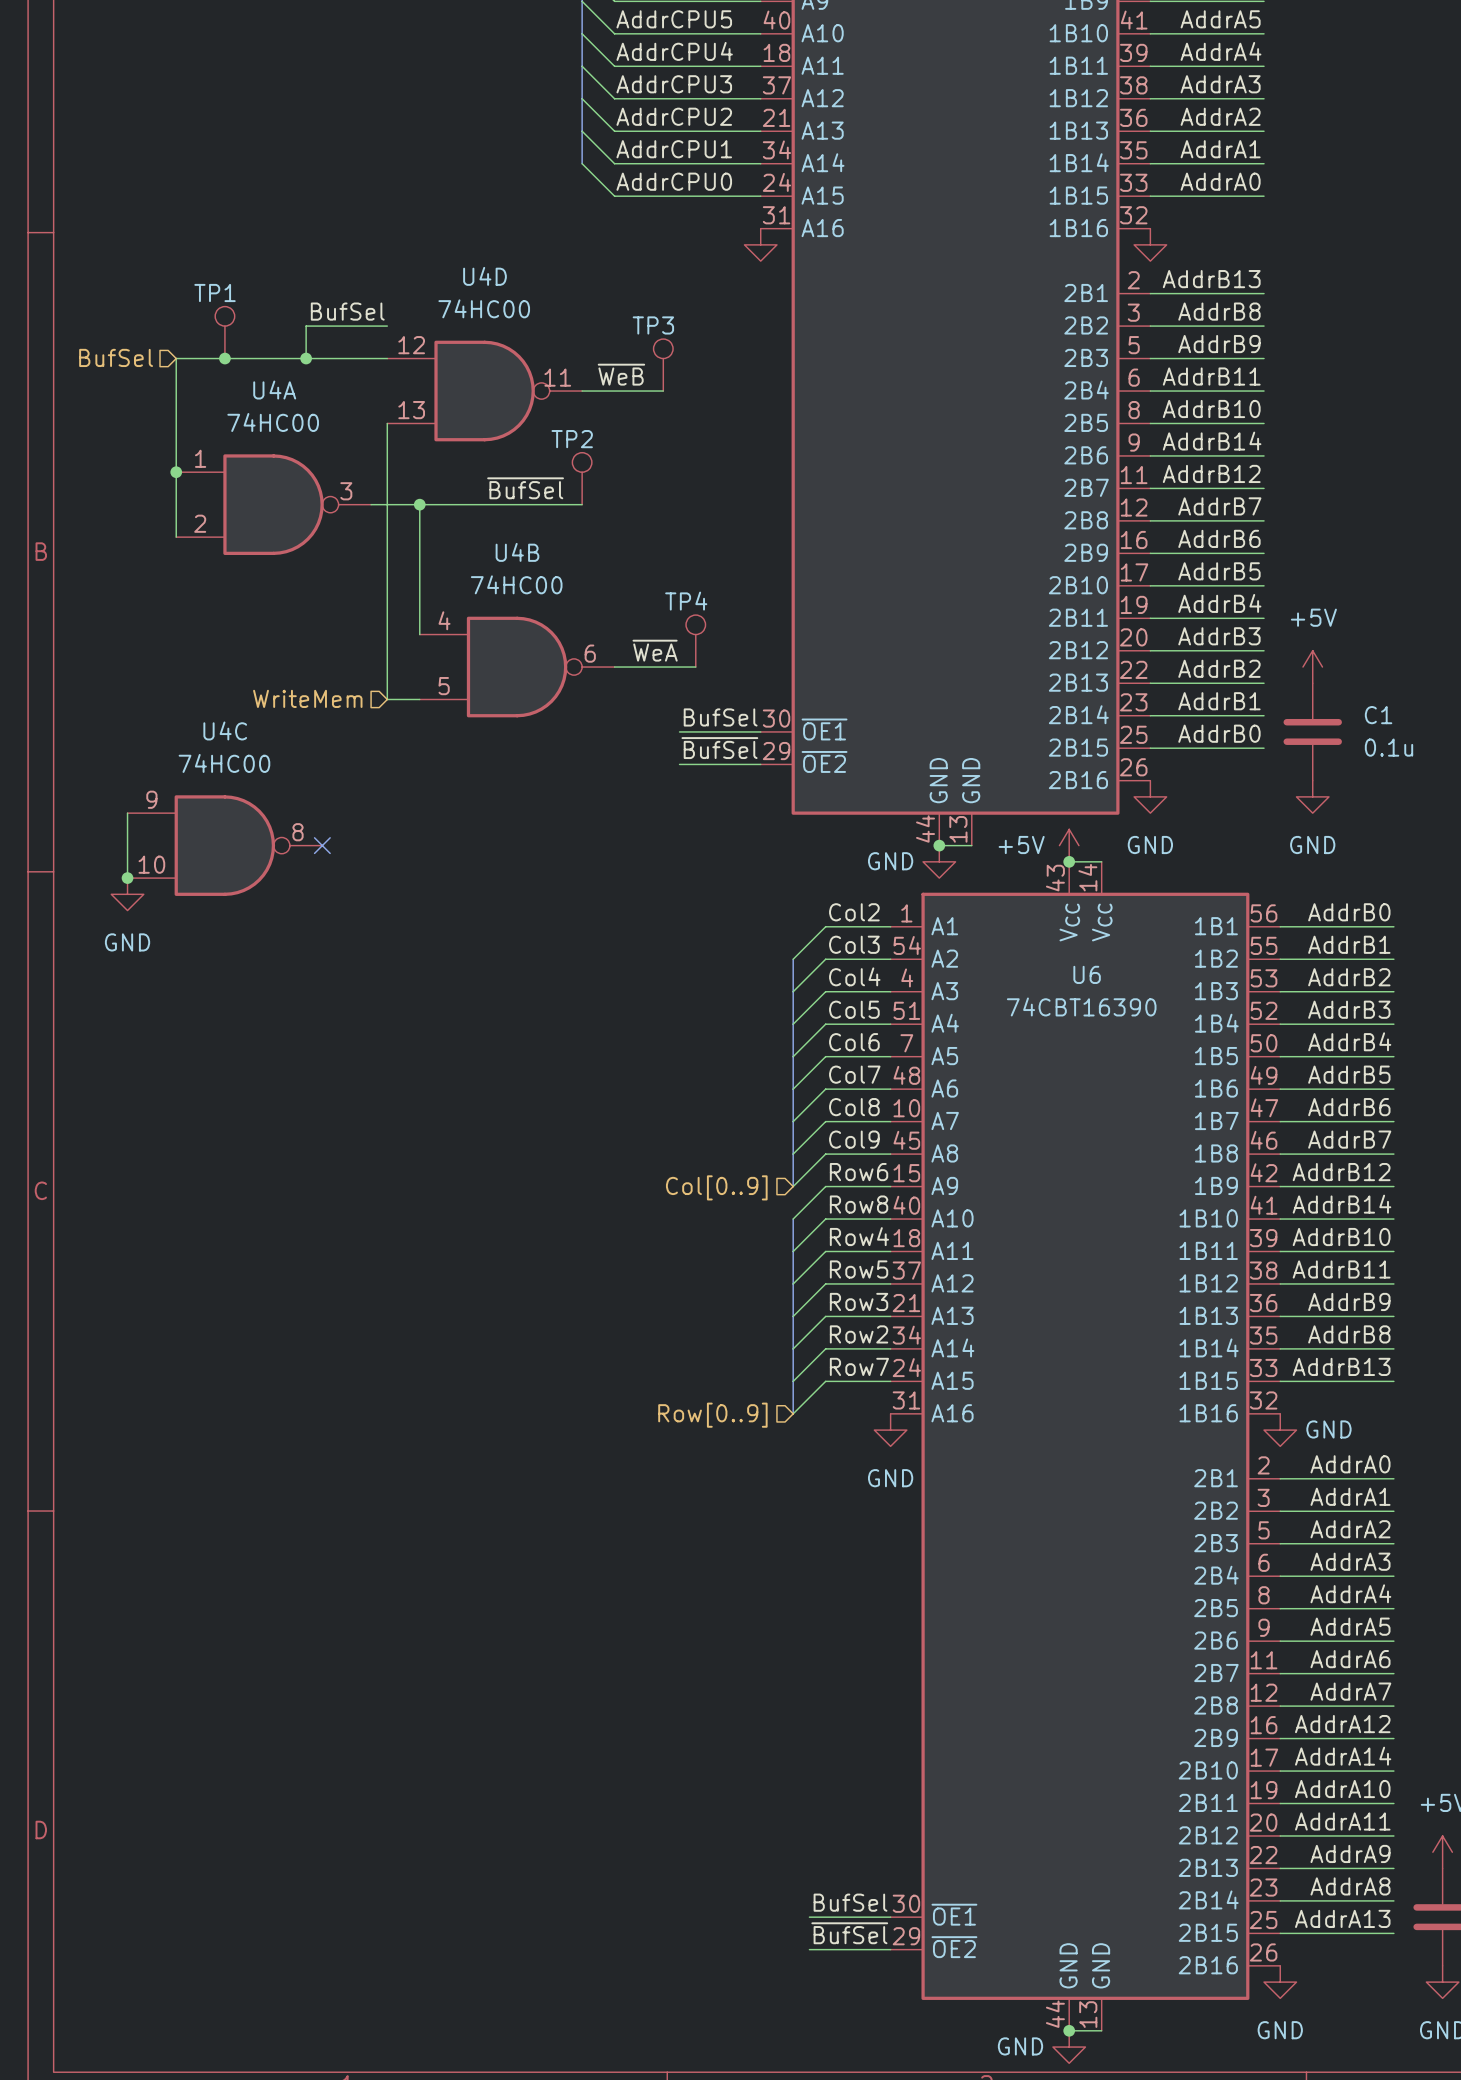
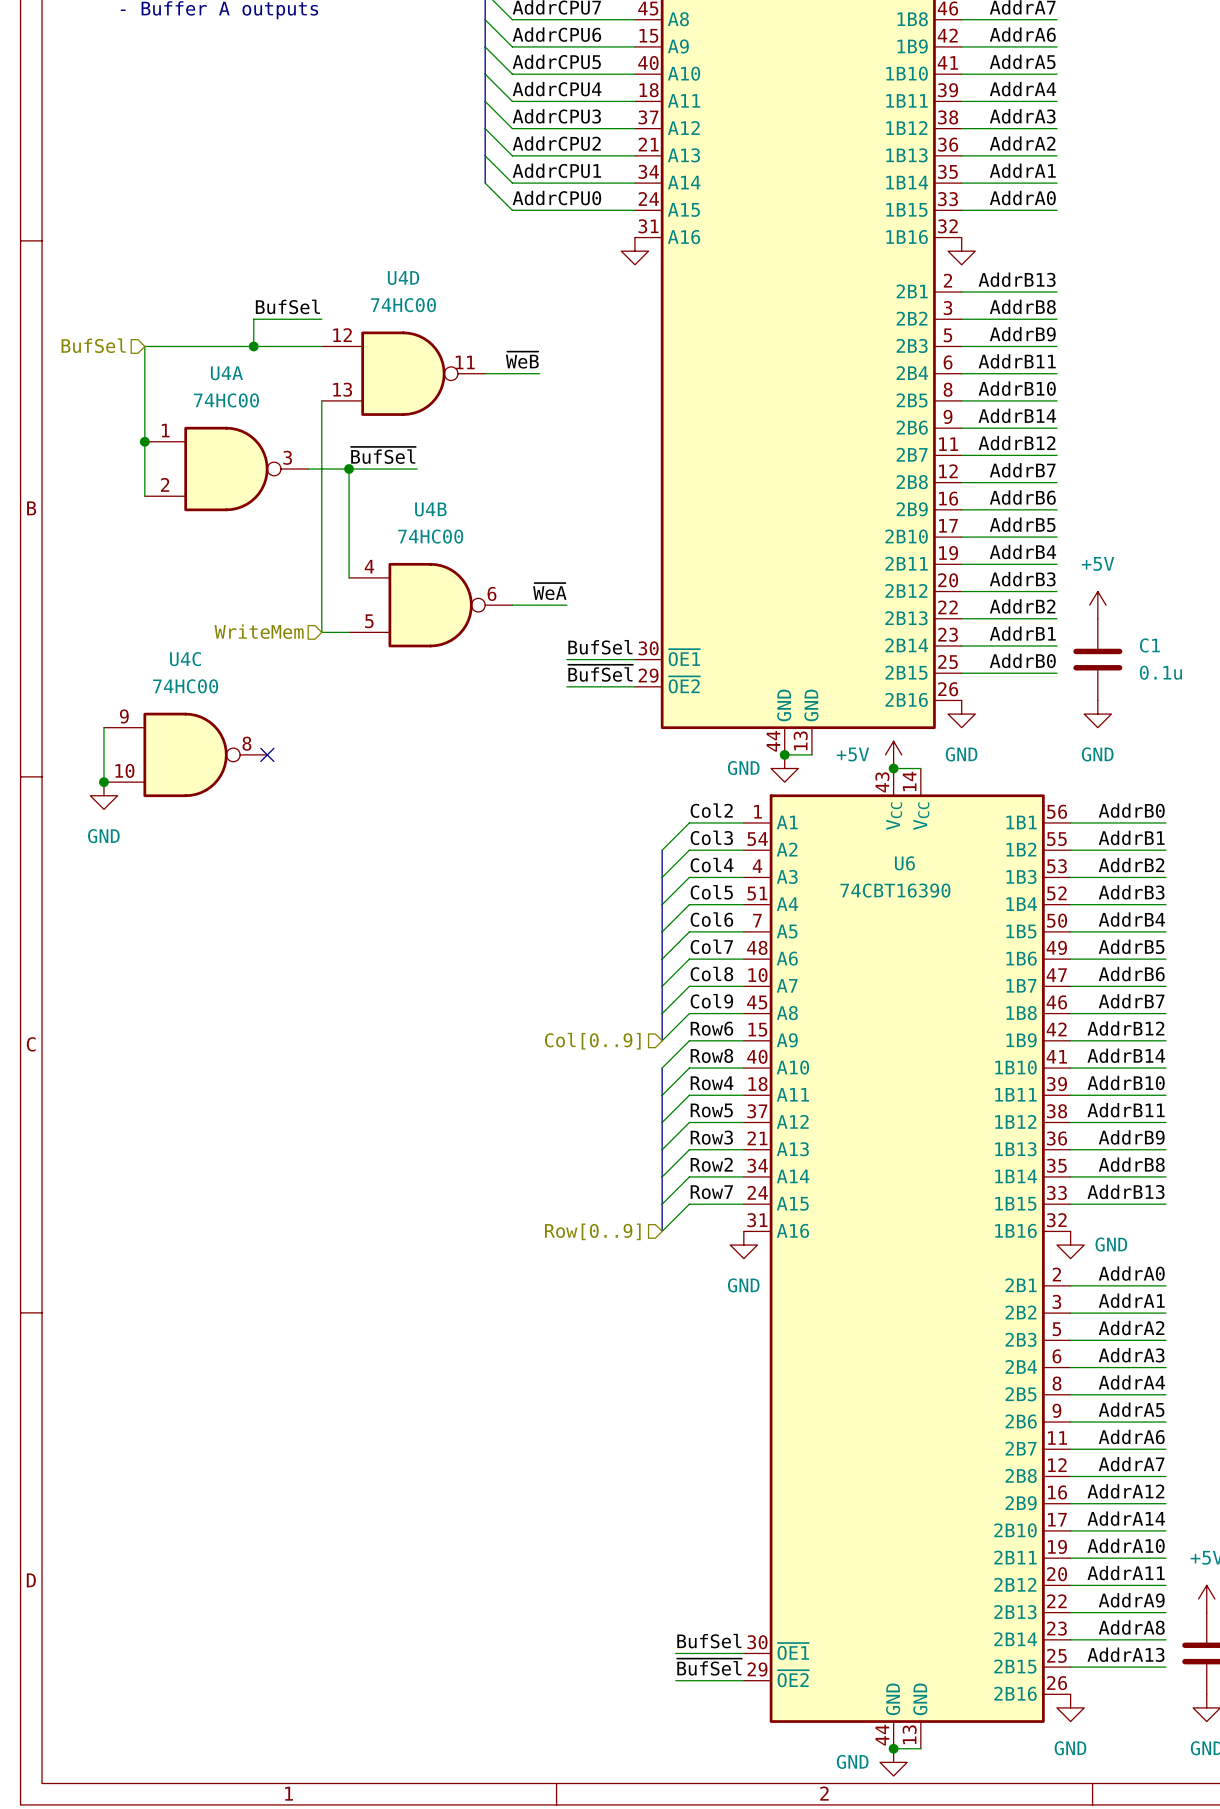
TP1: (224, 332) -> none
junction: (224, 358) -> none
TP3: (663, 365) -> none
wire: (647, 391) (663, 391) -> none
TP2: (582, 478) -> none
label position: ~{BufSel} (525, 488) -> ~{BufSel} (383, 455)
wire: (500, 504) (582, 504) -> none
TP4: (695, 641) -> none
wire: (679, 667) (695, 667) -> none

